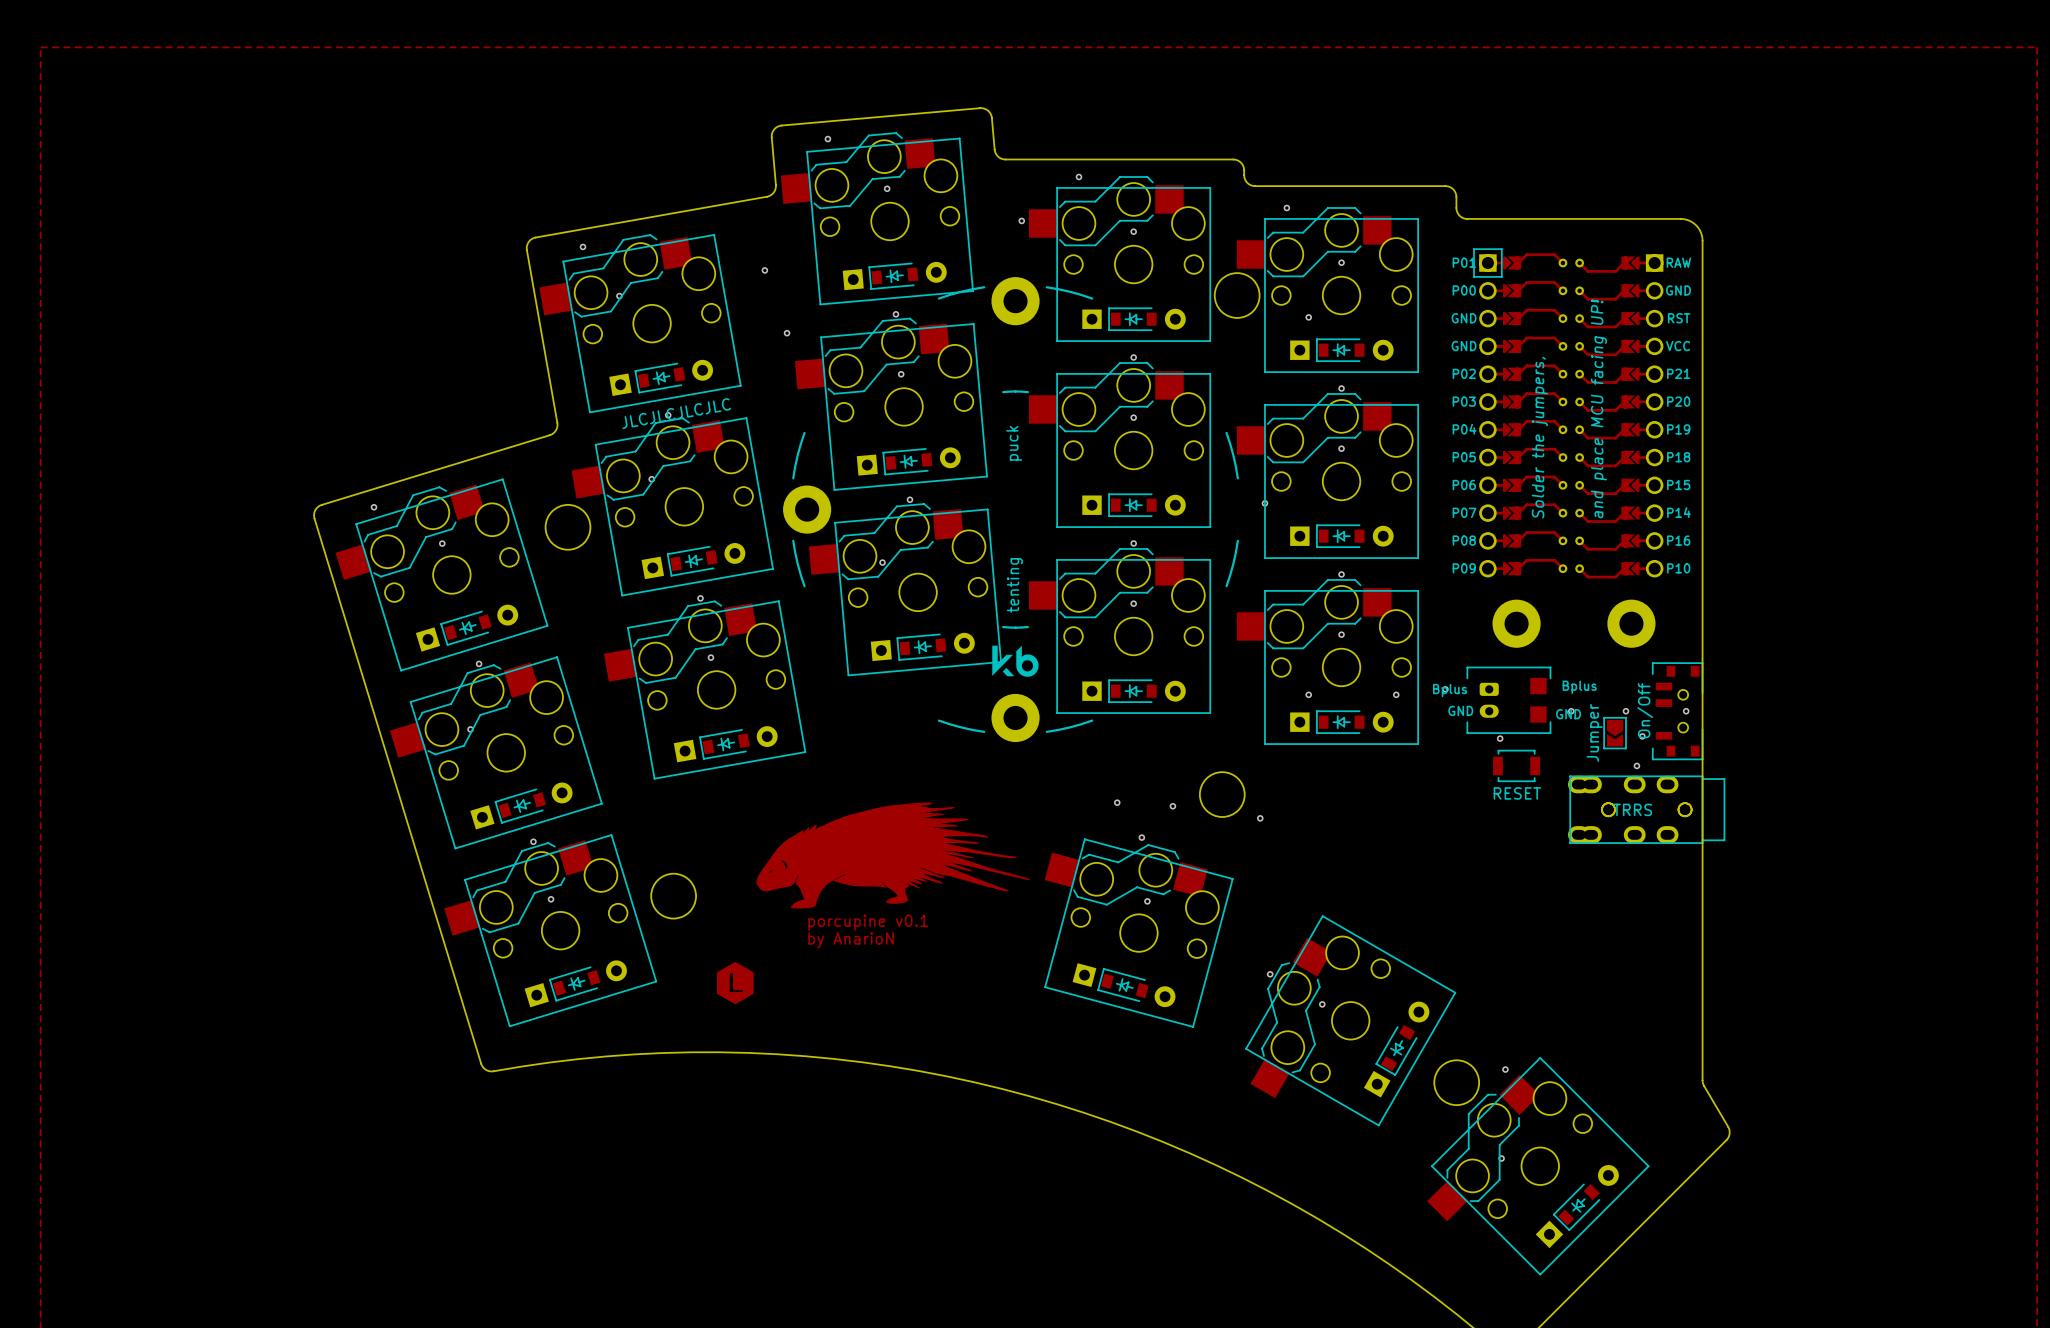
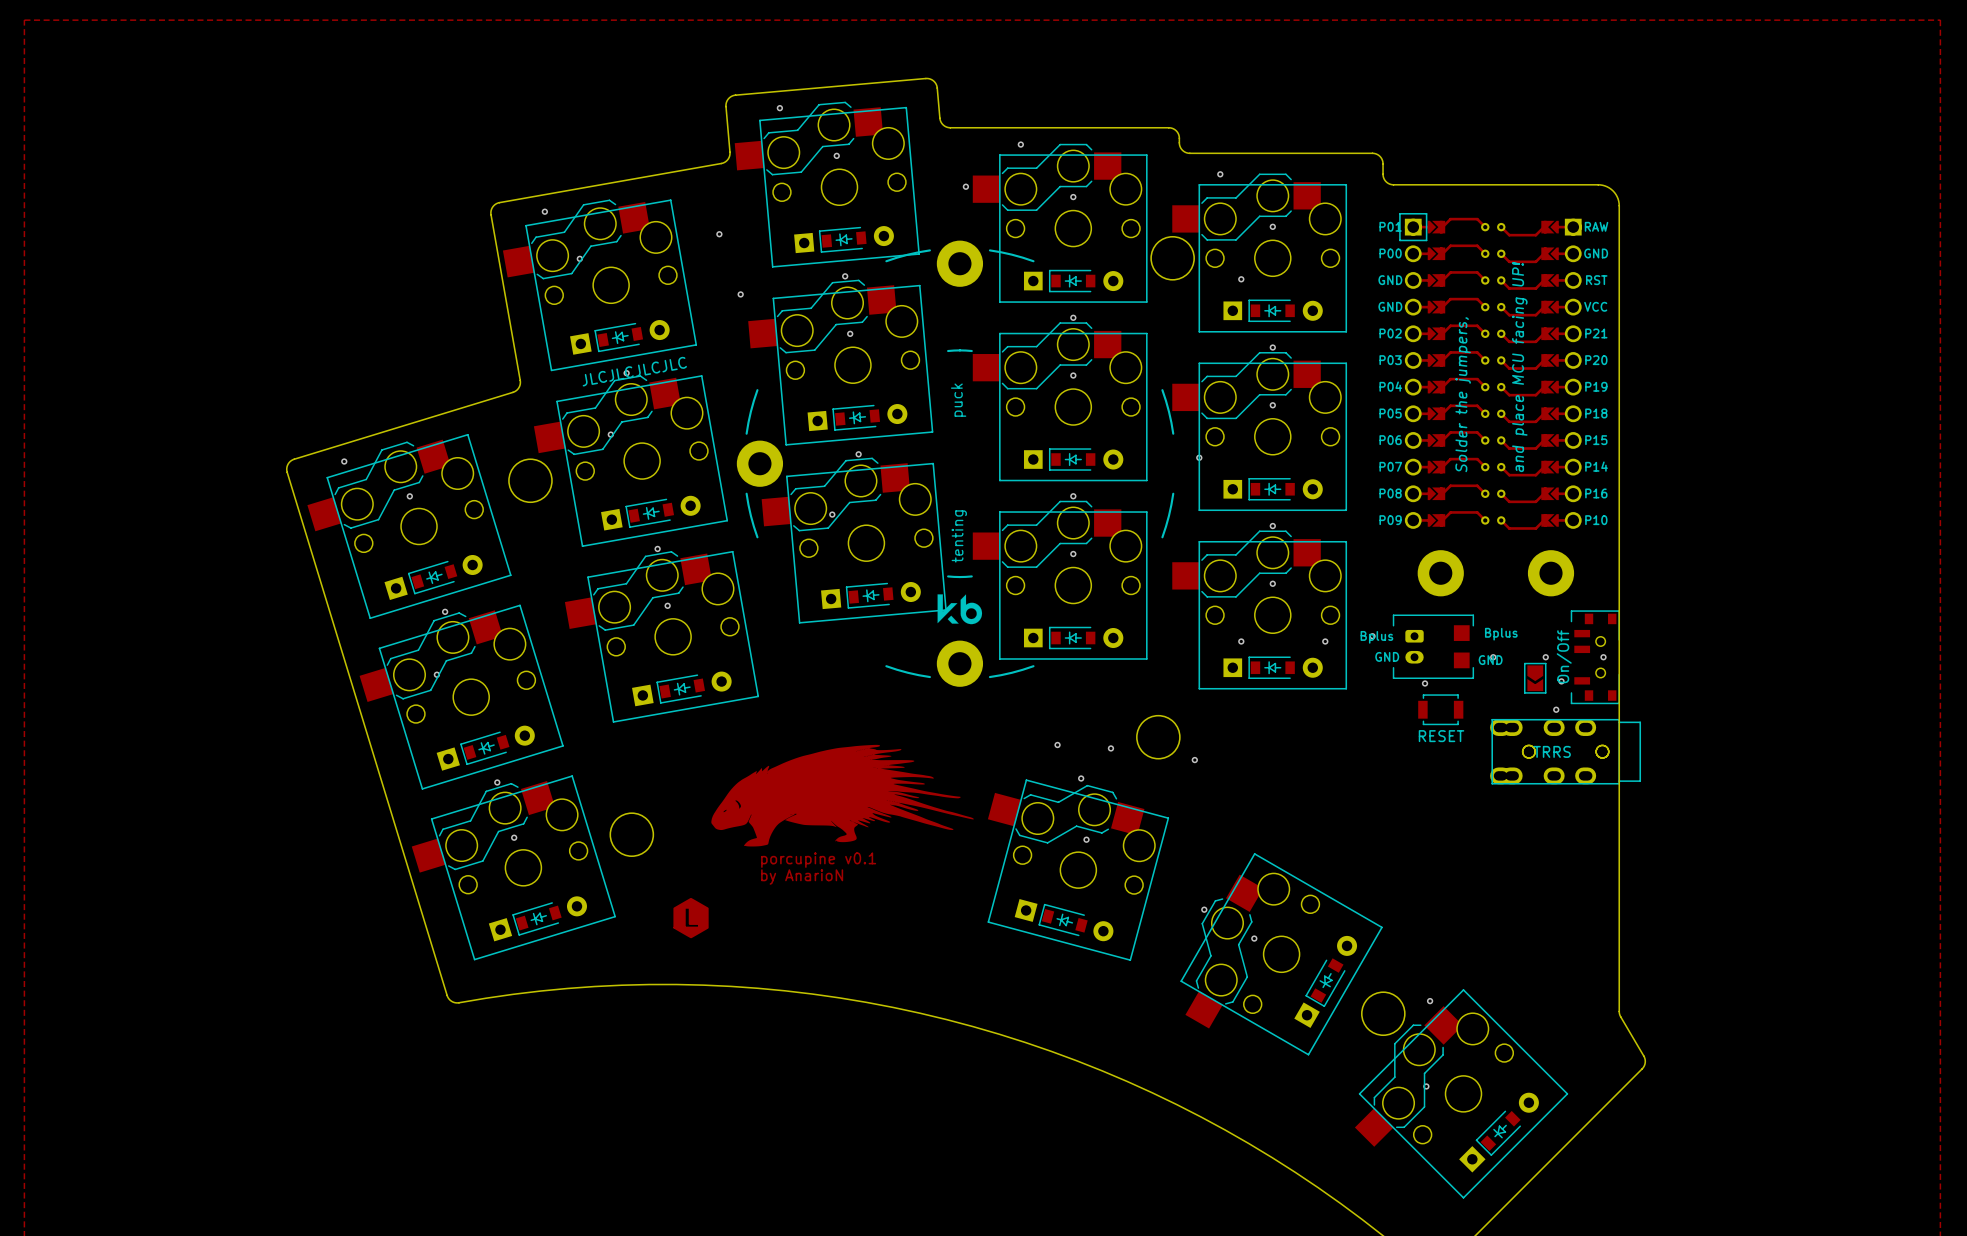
part value: Jumper (1594, 732) -> none

